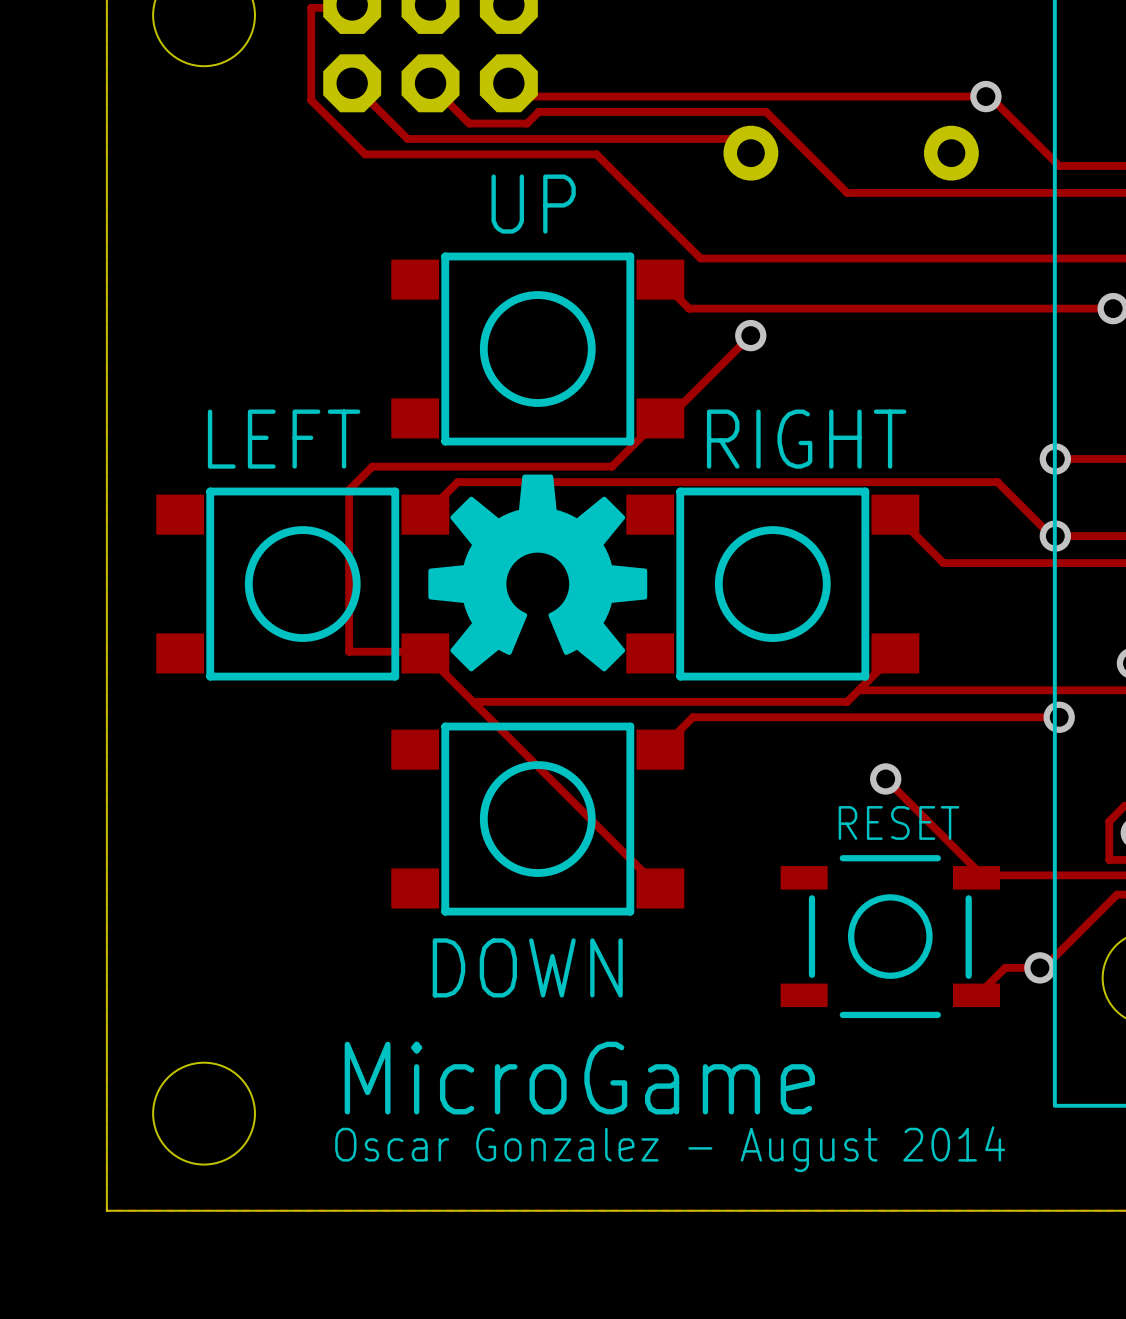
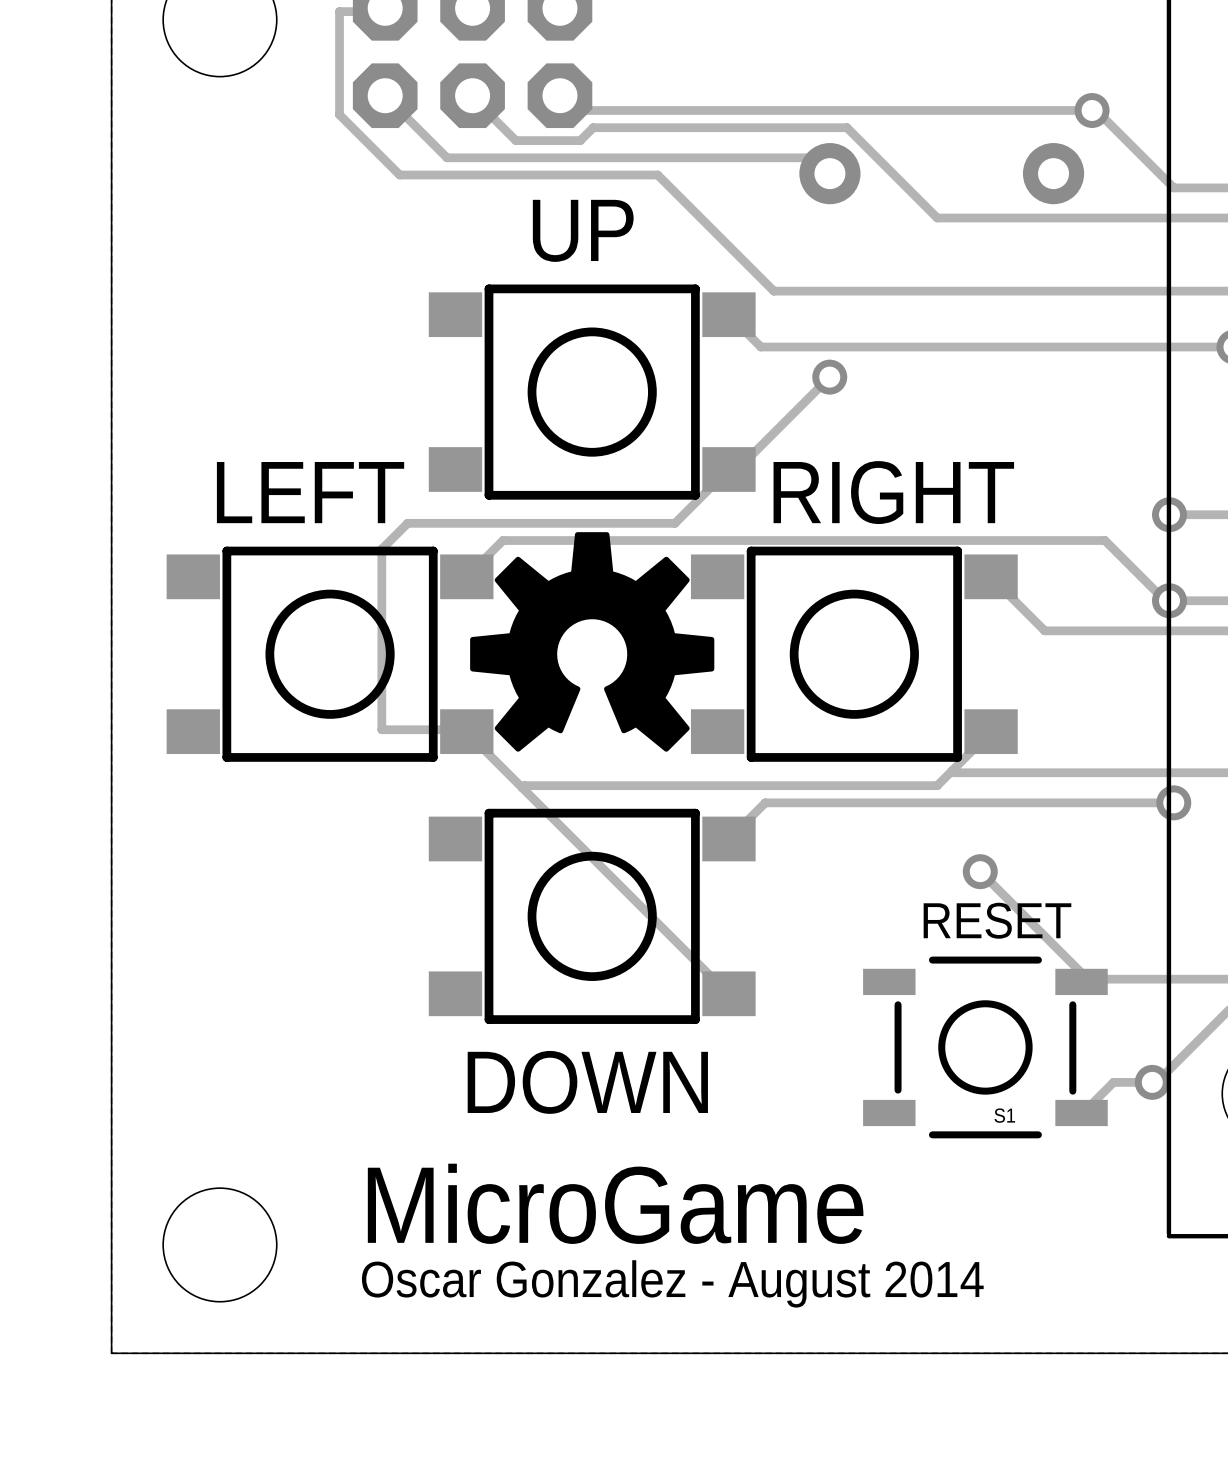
S1 name: none -> S1 (1004, 1115)

